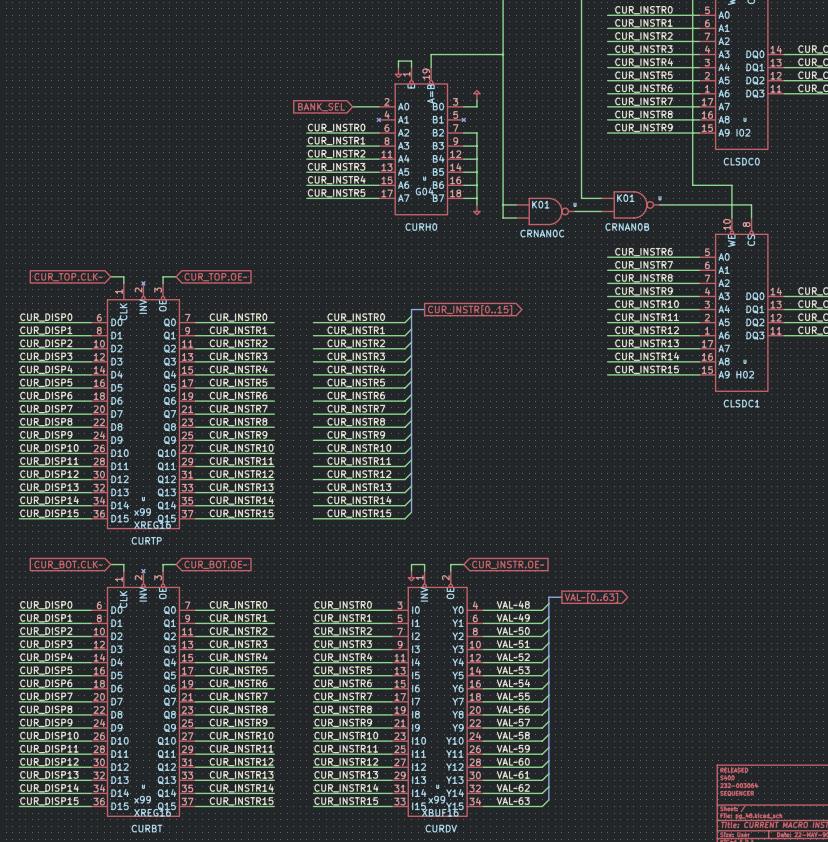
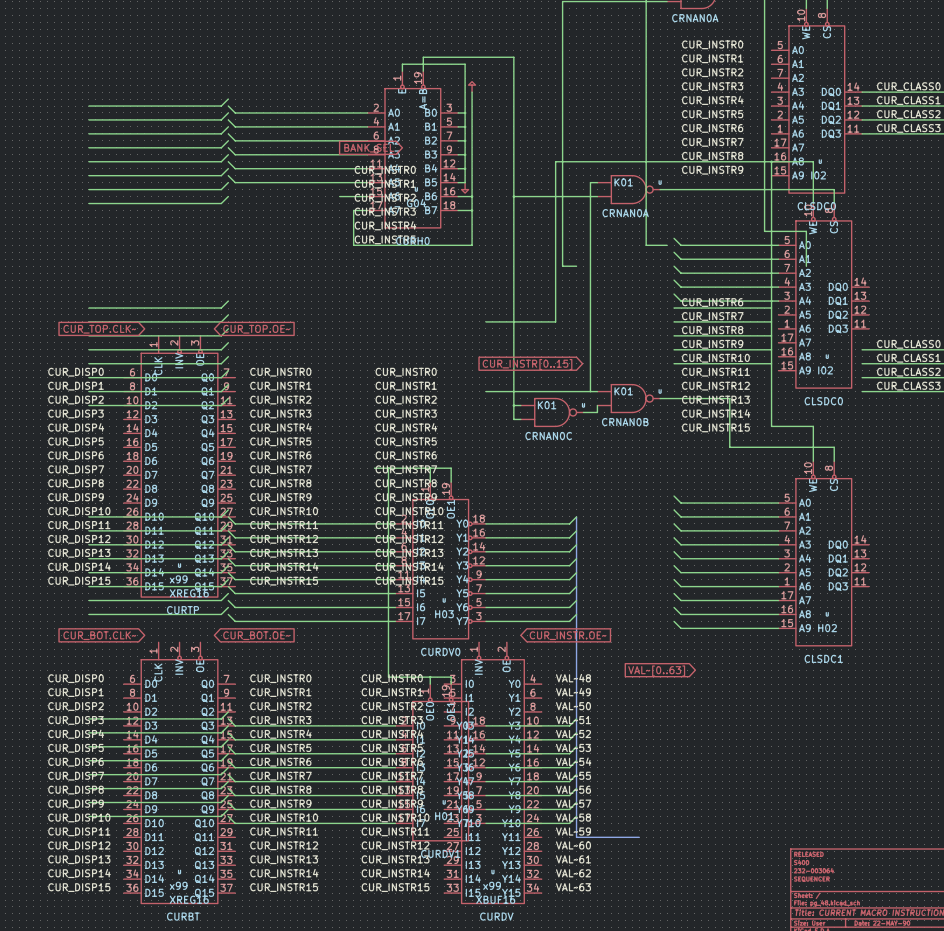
wire: (607, 15) (699, 15) -> none
wire: (607, 28) (699, 28) -> none
wire: none -> (423, 71) (423, 57) (513, 57) (513, 419) (520, 419)
wire: (607, 41) (699, 41) -> none
wire: none -> (472, 92) (472, 245) (430, 245)
wire: (503, 54) (431, 54) (431, 67) -> none
wire: (607, 54) (699, 54) -> none
wire: none -> (228, 99) (221, 106) (88, 106)
wire: (411, 61) (398, 61) (398, 67) -> (465, 99) (465, 64) (402, 64) (402, 71)
wire: none -> (228, 106) (235, 112) (367, 112)
wire: none -> (465, 106) (465, 182) (458, 182)
wire: (607, 67) (699, 67) -> none
power symbol position: (398, 72) -> (472, 86)
wire: none -> (228, 112) (221, 119) (88, 119)
power symbol rotation: 0° (398, 75) -> 180° (472, 83)
wire: none -> (228, 119) (235, 126) (367, 126)
wire: (607, 80) (699, 80) -> none
wire: none -> (228, 126) (221, 133) (88, 133)
wire: none -> (458, 126) (465, 126)
wire: none -> (228, 133) (235, 140) (367, 140)
wire: (607, 93) (699, 93) -> none
power symbol: (476, 95) -> none
wire: none -> (228, 140) (221, 147) (88, 147)
wire: none -> (458, 140) (465, 140)
wire: (476, 100) (476, 106) (463, 106) -> none
wire: none -> (228, 147) (235, 154) (367, 154)
wire: (352, 106) (378, 106) -> none
wire: (607, 106) (699, 106) -> none
part: none -> (412, 149)
wire: none -> (228, 154) (221, 161) (88, 161)
wire: none -> (458, 154) (465, 154)
wire: none -> (228, 161) (235, 168) (367, 168)
no-connect mark: (378, 119) -> none
no-connect mark: (463, 119) -> none
wire: none -> (674, 161) (555, 161) (555, 321) (485, 321)
wire: none -> (228, 168) (221, 175) (88, 175)
wire: none -> (458, 168) (465, 168)
wire: none -> (228, 175) (235, 182) (367, 182)
wire: (306, 133) (378, 133) -> none
wire: (463, 133) (476, 133) (476, 204) -> none
wire: (607, 133) (699, 133) -> none
wire: none -> (228, 182) (221, 189) (88, 189)
wire: none -> (597, 182) (590, 182) (590, 391)
part: (421, 141) -> none
power symbol: none -> (465, 187)
wire: (306, 146) (378, 146) -> none
wire: (463, 146) (476, 146) -> (458, 196) (472, 196)
part: none -> (628, 189)
wire: none -> (660, 189) (834, 189) (834, 203)
wire: none -> (228, 196) (221, 203) (88, 203)
wire: none -> (339, 196) (367, 196)
wire: none -> (513, 196) (597, 196)
wire: (306, 159) (378, 159) -> none
wire: (463, 159) (476, 159) -> (458, 210) (472, 210)
wire: none -> (813, 203) (813, 161) (771, 161) (771, 426) (813, 426) (813, 461)
wire: none -> (367, 210) (353, 210) (353, 245)
wire: (306, 172) (378, 172) -> none
wire: (463, 172) (476, 172) -> none
wire: (306, 185) (378, 185) -> none
wire: (463, 185) (476, 185) -> none
wire: none -> (674, 238) (681, 245) (778, 245)
wire: (463, 198) (476, 198) -> none
wire: (503, 204) (516, 204) -> none
wire: none -> (674, 252) (681, 259) (778, 259)
part: (630, 204) -> none
wire: (660, 204) (751, 204) (751, 218) -> none
power symbol: (476, 209) -> none
part: (545, 211) -> none
wire: (575, 211) (601, 211) -> none
wire: none -> (674, 266) (681, 273) (778, 273)
wire: none -> (674, 280) (681, 287) (778, 287)
wire: none -> (674, 294) (681, 301) (778, 301)
part: none -> (823, 295)
wire: none -> (228, 301) (221, 308) (88, 308)
wire: none -> (228, 314) (221, 321) (88, 321)
wire: (110, 276) (123, 276) (123, 283) -> none
wire: (176, 276) (163, 276) (163, 283) -> none
wire: none -> (228, 328) (221, 335) (88, 335)
no-connect mark: (143, 283) -> none
wire: none -> (228, 342) (221, 349) (88, 349)
wire: none -> (228, 356) (221, 363) (88, 363)
part: (741, 304) -> none
bus: (424, 309) (411, 309) (411, 512) -> none
wire: none -> (228, 370) (221, 377) (123, 377)
wire: (411, 316) (404, 322) (313, 322) -> none
wire: (19, 322) (58, 322) -> none
wire: (195, 322) (274, 322) -> none
wire: (607, 322) (699, 322) -> none
wire: none -> (228, 384) (221, 391) (123, 391)
wire: (411, 329) (404, 335) (313, 335) -> none
wire: (19, 335) (58, 335) -> none
wire: (195, 335) (274, 335) -> none
wire: none -> (485, 391) (597, 391)
wire: (607, 335) (699, 335) -> none
wire: none -> (228, 398) (221, 405) (123, 405)
wire: (411, 342) (404, 348) (313, 348) -> none
part: none -> (628, 398)
wire: none -> (660, 398) (729, 398) (729, 447) (834, 447) (834, 461)
wire: (19, 348) (58, 348) -> none
wire: (195, 348) (274, 348) -> none
wire: none -> (513, 405) (520, 405)
wire: none -> (597, 405) (597, 412) (583, 412)
wire: (607, 348) (699, 348) -> none
wire: (411, 355) (404, 361) (313, 361) -> none
part: none -> (552, 412)
wire: (19, 361) (91, 361) -> none
wire: (195, 361) (274, 361) -> none
wire: (607, 361) (699, 361) -> none
wire: (411, 368) (404, 374) (313, 374) -> none
wire: (19, 374) (91, 374) -> none
wire: (195, 374) (274, 374) -> none
wire: (607, 374) (699, 374) -> none
wire: (411, 381) (404, 388) (313, 388) -> none
wire: (19, 388) (91, 388) -> none
wire: (195, 388) (274, 388) -> none
wire: (411, 394) (404, 401) (313, 401) -> none
wire: (19, 401) (91, 401) -> none
wire: (195, 401) (274, 401) -> none
wire: none -> (374, 468) (451, 468) (451, 482)
wire: none -> (388, 468) (388, 677) (451, 677) (451, 684)
wire: none -> (430, 468) (430, 482)
wire: (411, 407) (404, 414) (313, 414) -> none
wire: (19, 414) (91, 414) -> none
wire: (195, 414) (274, 414) -> none
wire: (411, 420) (404, 427) (313, 427) -> none
wire: (19, 427) (91, 427) -> none
wire: (195, 427) (274, 427) -> none
wire: (411, 433) (404, 440) (313, 440) -> none
wire: none -> (674, 496) (681, 503) (778, 503)
wire: (19, 440) (91, 440) -> none
wire: (195, 440) (274, 440) -> none
wire: none -> (228, 509) (221, 516) (123, 516)
wire: (411, 446) (404, 453) (313, 453) -> none
wire: none -> (674, 509) (681, 516) (778, 516)
wire: (19, 453) (58, 453) -> none
wire: none -> (228, 516) (235, 523) (395, 523)
wire: (195, 453) (274, 453) -> none
wire: none -> (576, 516) (569, 523) (485, 523)
bus: none -> (576, 516) (576, 837) (639, 837)
wire: none -> (228, 523) (221, 530) (123, 530)
wire: (411, 459) (404, 466) (313, 466) -> none
wire: none -> (674, 523) (681, 530) (778, 530)
wire: (19, 466) (58, 466) -> none
wire: none -> (228, 530) (235, 537) (395, 537)
wire: (195, 466) (274, 466) -> none
wire: none -> (576, 530) (569, 537) (485, 537)
wire: none -> (228, 537) (221, 544) (123, 544)
wire: (411, 473) (404, 479) (313, 479) -> none
wire: none -> (674, 537) (681, 544) (778, 544)
wire: (19, 479) (58, 479) -> none
wire: none -> (228, 544) (235, 551) (395, 551)
wire: (195, 479) (274, 479) -> none
wire: none -> (576, 544) (569, 551) (485, 551)
wire: none -> (228, 551) (221, 558) (123, 558)
wire: (411, 486) (404, 492) (313, 492) -> none
wire: none -> (674, 551) (681, 558) (778, 558)
part: none -> (823, 553)
wire: (19, 492) (58, 492) -> none
wire: none -> (228, 558) (235, 565) (395, 565)
wire: (195, 492) (274, 492) -> none
wire: none -> (576, 558) (569, 565) (485, 565)
part: none -> (440, 560)
wire: none -> (228, 565) (221, 572) (123, 572)
wire: (411, 499) (404, 505) (313, 505) -> none
wire: none -> (674, 565) (681, 572) (778, 572)
wire: (19, 505) (58, 505) -> none
wire: none -> (228, 572) (235, 579) (395, 579)
wire: (195, 505) (274, 505) -> none
wire: none -> (576, 572) (569, 579) (485, 579)
wire: none -> (228, 579) (221, 586) (123, 586)
wire: (411, 512) (404, 518) (313, 518) -> none
wire: none -> (674, 579) (681, 586) (778, 586)
wire: (19, 518) (58, 518) -> none
wire: none -> (228, 586) (235, 593) (395, 593)
wire: (195, 518) (274, 518) -> none
wire: none -> (576, 586) (569, 593) (485, 593)
wire: none -> (228, 593) (221, 600) (88, 600)
wire: none -> (674, 593) (681, 600) (778, 600)
wire: none -> (228, 600) (235, 607) (395, 607)
wire: none -> (576, 600) (569, 607) (485, 607)
wire: none -> (228, 607) (221, 614) (88, 614)
wire: none -> (674, 607) (681, 614) (778, 614)
wire: none -> (228, 614) (235, 621) (395, 621)
wire: none -> (576, 614) (569, 621) (485, 621)
wire: none -> (674, 621) (681, 628) (778, 628)
wire: (110, 564) (123, 564) (123, 571) -> none
wire: (176, 564) (163, 564) (163, 571) -> none
wire: (463, 564) (450, 564) (450, 571) -> none
no-connect mark: (143, 571) -> none
wire: (411, 571) (411, 564) (424, 564) (424, 571) -> none
power symbol: (411, 576) -> none
bus: (561, 597) (548, 597) (548, 799) -> none
wire: none -> (430, 677) (430, 684)
wire: (548, 603) (542, 610) (483, 610) -> none
wire: (19, 610) (91, 610) -> none
wire: (195, 610) (274, 610) -> none
wire: (313, 610) (391, 610) -> none
wire: (548, 616) (542, 623) (483, 623) -> none
wire: (19, 623) (91, 623) -> none
wire: (195, 623) (274, 623) -> none
wire: (313, 623) (391, 623) -> none
wire: (548, 629) (542, 636) (483, 636) -> none
wire: (19, 636) (91, 636) -> none
wire: none -> (228, 711) (221, 718) (88, 718)
wire: (195, 636) (274, 636) -> none
wire: (313, 636) (391, 636) -> none
wire: none -> (228, 718) (235, 725)
wire: (548, 643) (542, 649) (509, 649) -> (576, 718) (569, 725)
wire: (19, 649) (91, 649) -> none
wire: none -> (228, 725) (221, 732) (88, 732)
wire: none -> (318, 725) (360, 725)
wire: (346, 649) (391, 649) -> none
wire: none -> (485, 725) (541, 725)
wire: none -> (228, 732) (235, 739)
wire: (548, 656) (542, 662) (509, 662) -> (576, 732) (569, 739)
wire: (19, 662) (91, 662) -> none
wire: none -> (228, 739) (221, 746) (88, 746)
wire: none -> (318, 739) (360, 739)
wire: (346, 662) (391, 662) -> none
wire: none -> (485, 739) (541, 739)
wire: none -> (228, 746) (235, 753)
wire: (548, 669) (542, 675) (509, 675) -> (576, 746) (569, 753)
wire: (19, 675) (91, 675) -> none
wire: none -> (228, 753) (221, 760) (88, 760)
wire: none -> (318, 753) (360, 753)
wire: (346, 675) (391, 675) -> none
wire: none -> (485, 753) (541, 753)
wire: none -> (228, 760) (235, 767)
wire: (548, 682) (542, 688) (509, 688) -> (576, 760) (569, 767)
part: none -> (440, 762)
wire: (19, 688) (91, 688) -> none
wire: none -> (228, 767) (221, 774) (88, 774)
wire: none -> (318, 767) (360, 767)
wire: (346, 688) (391, 688) -> none
wire: none -> (485, 767) (541, 767)
wire: none -> (228, 774) (235, 781)
wire: (548, 695) (542, 701) (509, 701) -> (576, 774) (569, 781)
wire: (19, 701) (91, 701) -> none
wire: none -> (228, 781) (221, 788) (88, 788)
wire: none -> (318, 781) (360, 781)
wire: (346, 701) (391, 701) -> none
wire: none -> (485, 781) (541, 781)
wire: none -> (228, 788) (235, 795)
wire: (548, 708) (542, 714) (509, 714) -> (576, 788) (569, 795)
wire: (19, 714) (91, 714) -> none
wire: none -> (228, 795) (221, 802) (88, 802)
wire: none -> (318, 795) (360, 795)
wire: (346, 714) (391, 714) -> none
wire: none -> (485, 795) (541, 795)
wire: none -> (228, 802) (235, 809)
wire: (548, 721) (542, 728) (509, 728) -> (576, 802) (569, 809)
wire: (19, 728) (91, 728) -> none
wire: none -> (228, 809) (221, 816) (88, 816)
wire: none -> (318, 809) (360, 809)
wire: (346, 728) (391, 728) -> none
wire: none -> (485, 809) (541, 809)
wire: none -> (228, 816) (235, 823)
wire: (548, 734) (542, 741) (509, 741) -> (576, 816) (569, 823)
wire: (19, 741) (91, 741) -> none
wire: none -> (318, 823) (360, 823)
wire: (346, 741) (391, 741) -> none
wire: none -> (485, 823) (541, 823)
wire: (548, 747) (542, 754) (483, 754) -> none
wire: (19, 754) (91, 754) -> none
wire: (195, 754) (274, 754) -> none
wire: (313, 754) (391, 754) -> none
wire: (548, 760) (542, 767) (483, 767) -> none
wire: (19, 767) (91, 767) -> none
wire: (195, 767) (274, 767) -> none
wire: (313, 767) (391, 767) -> none
wire: (548, 773) (542, 780) (483, 780) -> none
wire: (19, 780) (91, 780) -> none
wire: (195, 780) (274, 780) -> none
wire: (313, 780) (391, 780) -> none
wire: (548, 786) (542, 793) (483, 793) -> none
wire: (19, 793) (91, 793) -> none
wire: (195, 793) (274, 793) -> none
wire: (313, 793) (391, 793) -> none
wire: (548, 799) (542, 806) (483, 806) -> none
wire: (19, 806) (91, 806) -> none
wire: (195, 806) (274, 806) -> none
wire: (313, 806) (391, 806) -> none

